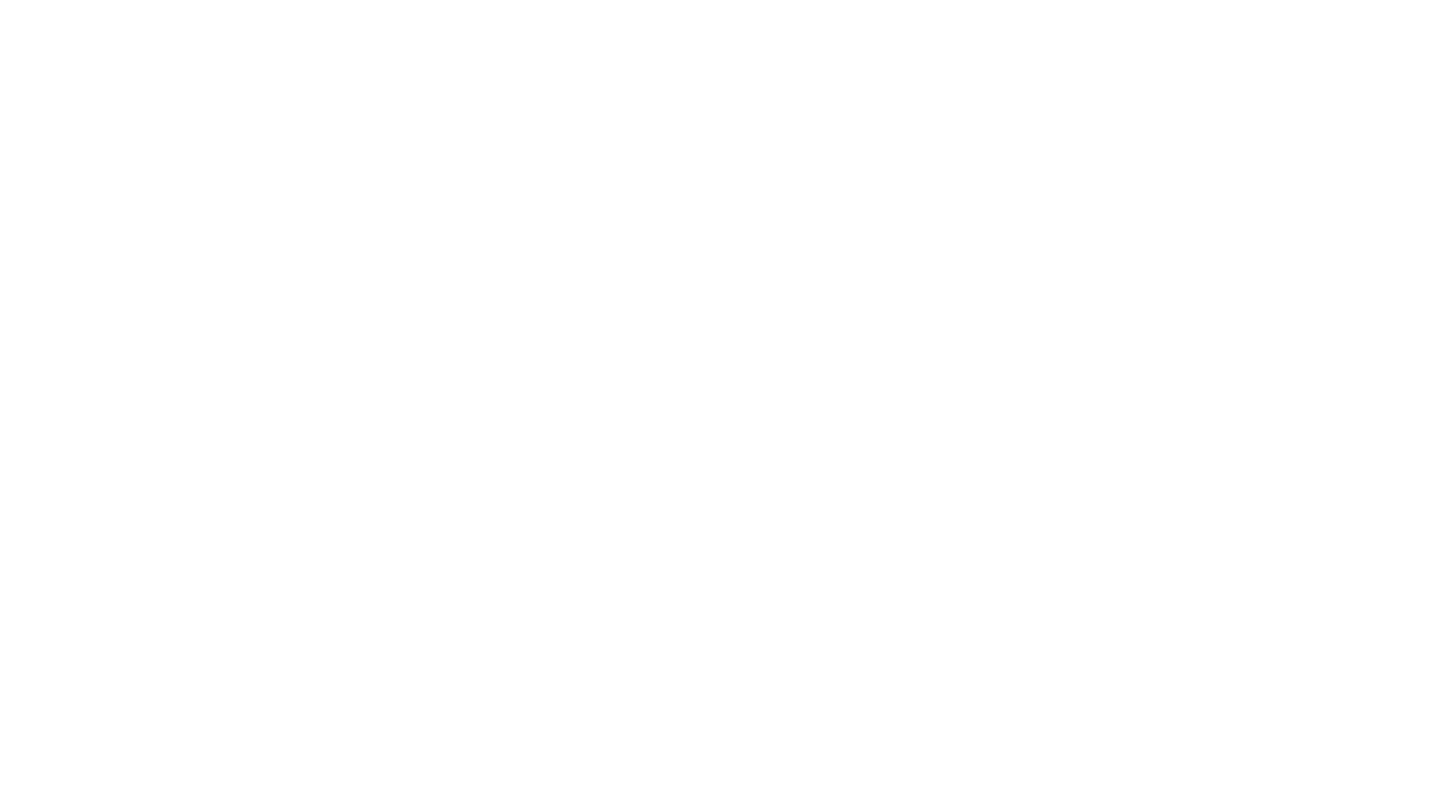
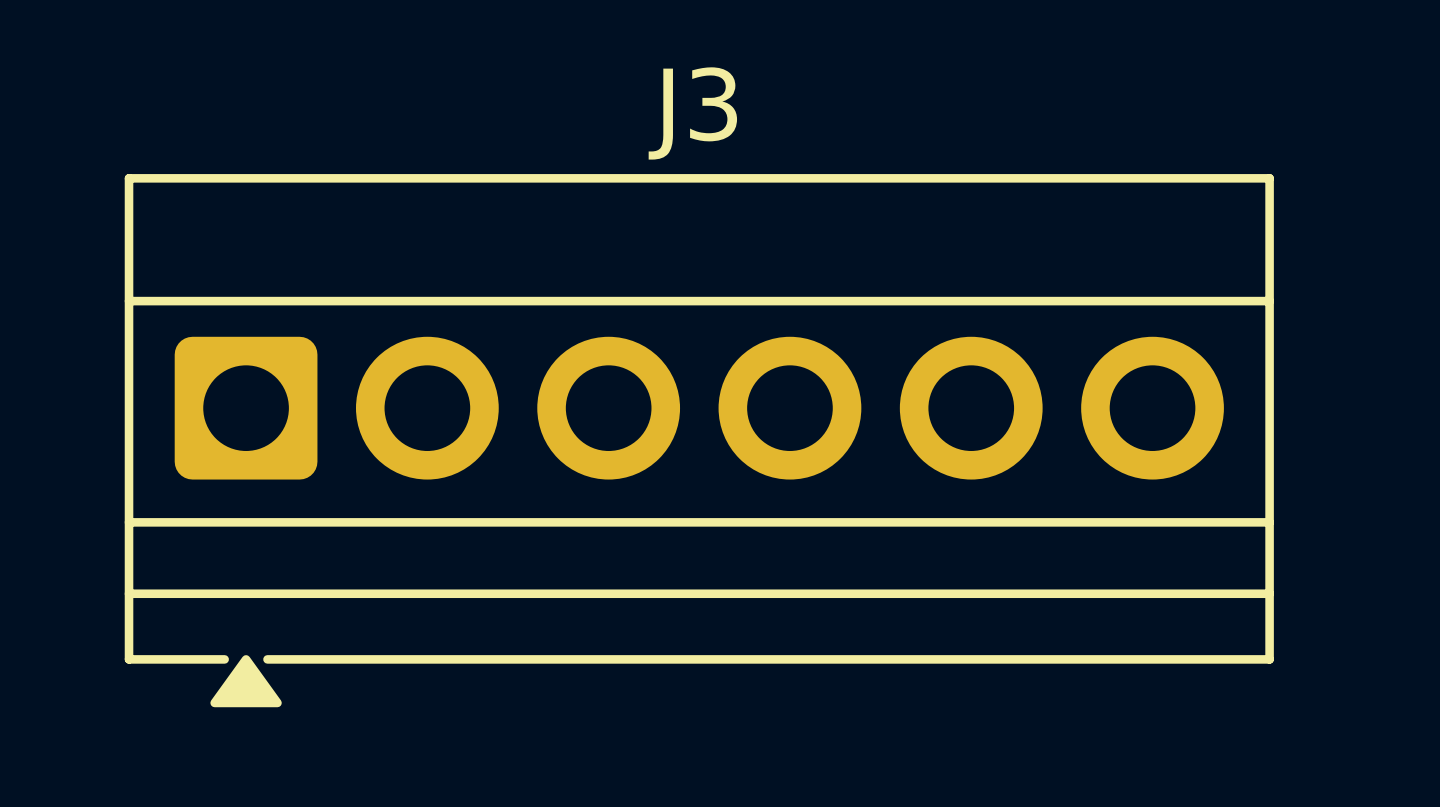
J3: none -> (699, 440)

